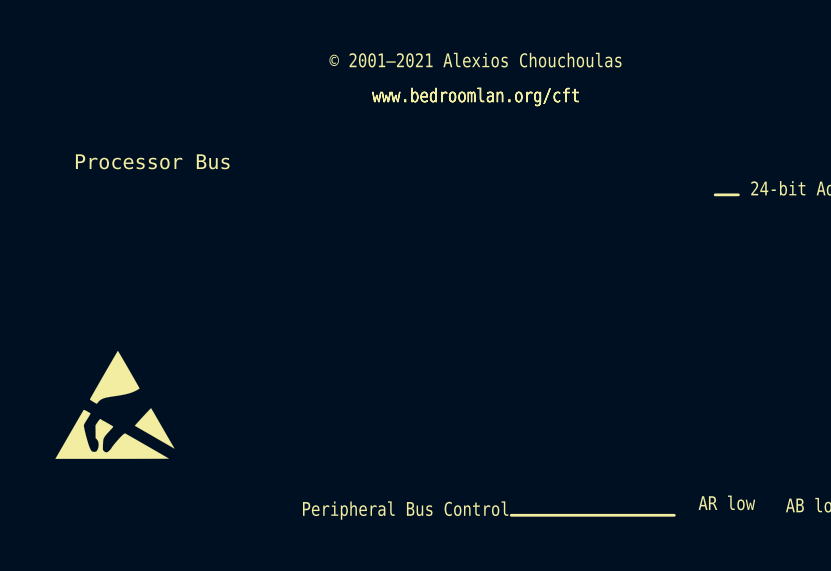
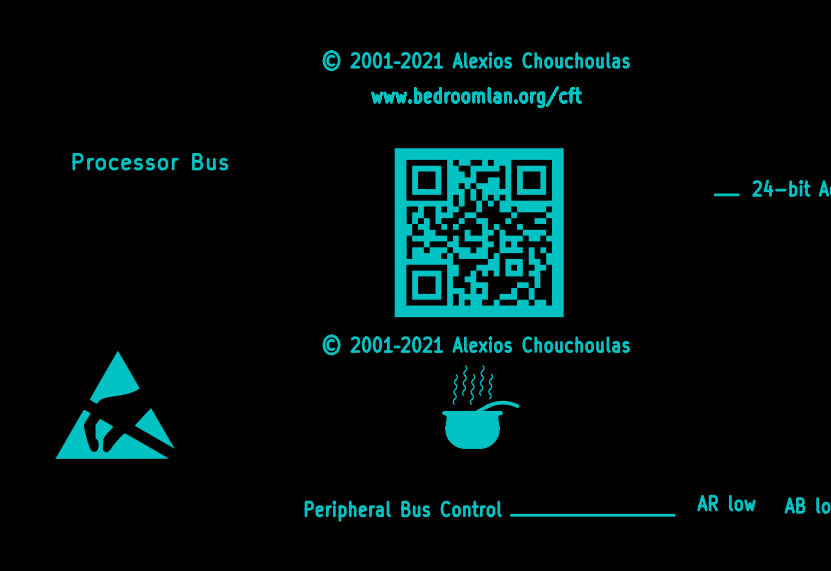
drawing: none -> [394, 148, 564, 318]
text: none -> © 2001–2021 Alexios Chouchoulas (476, 344)
drawing: none -> [442, 365, 520, 449]

